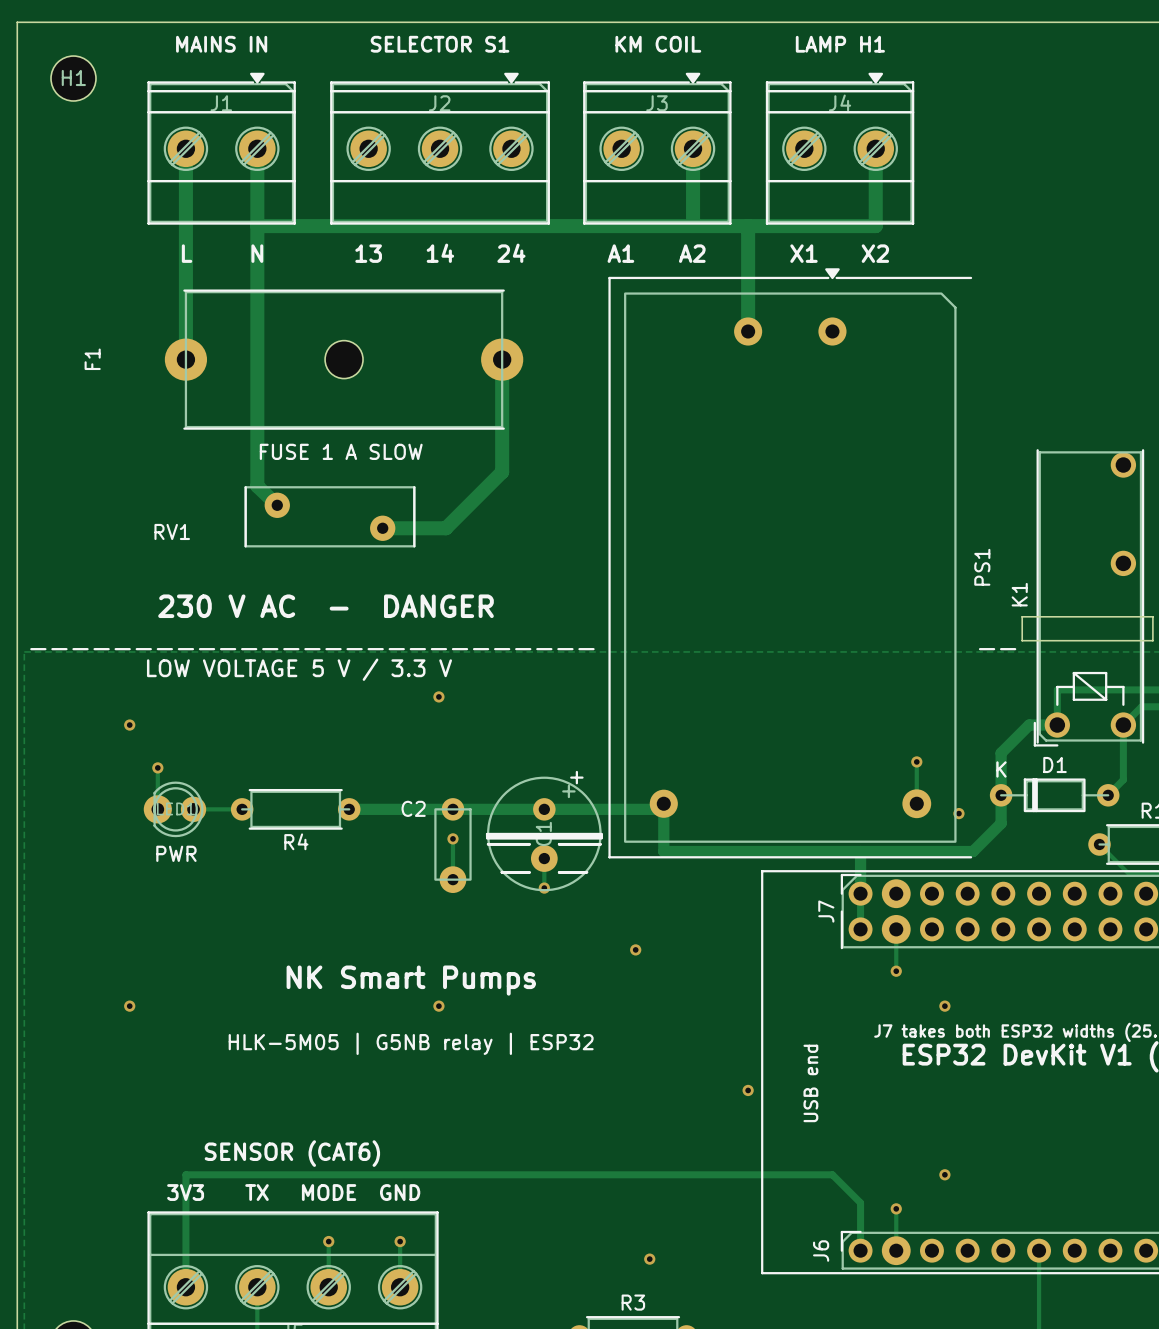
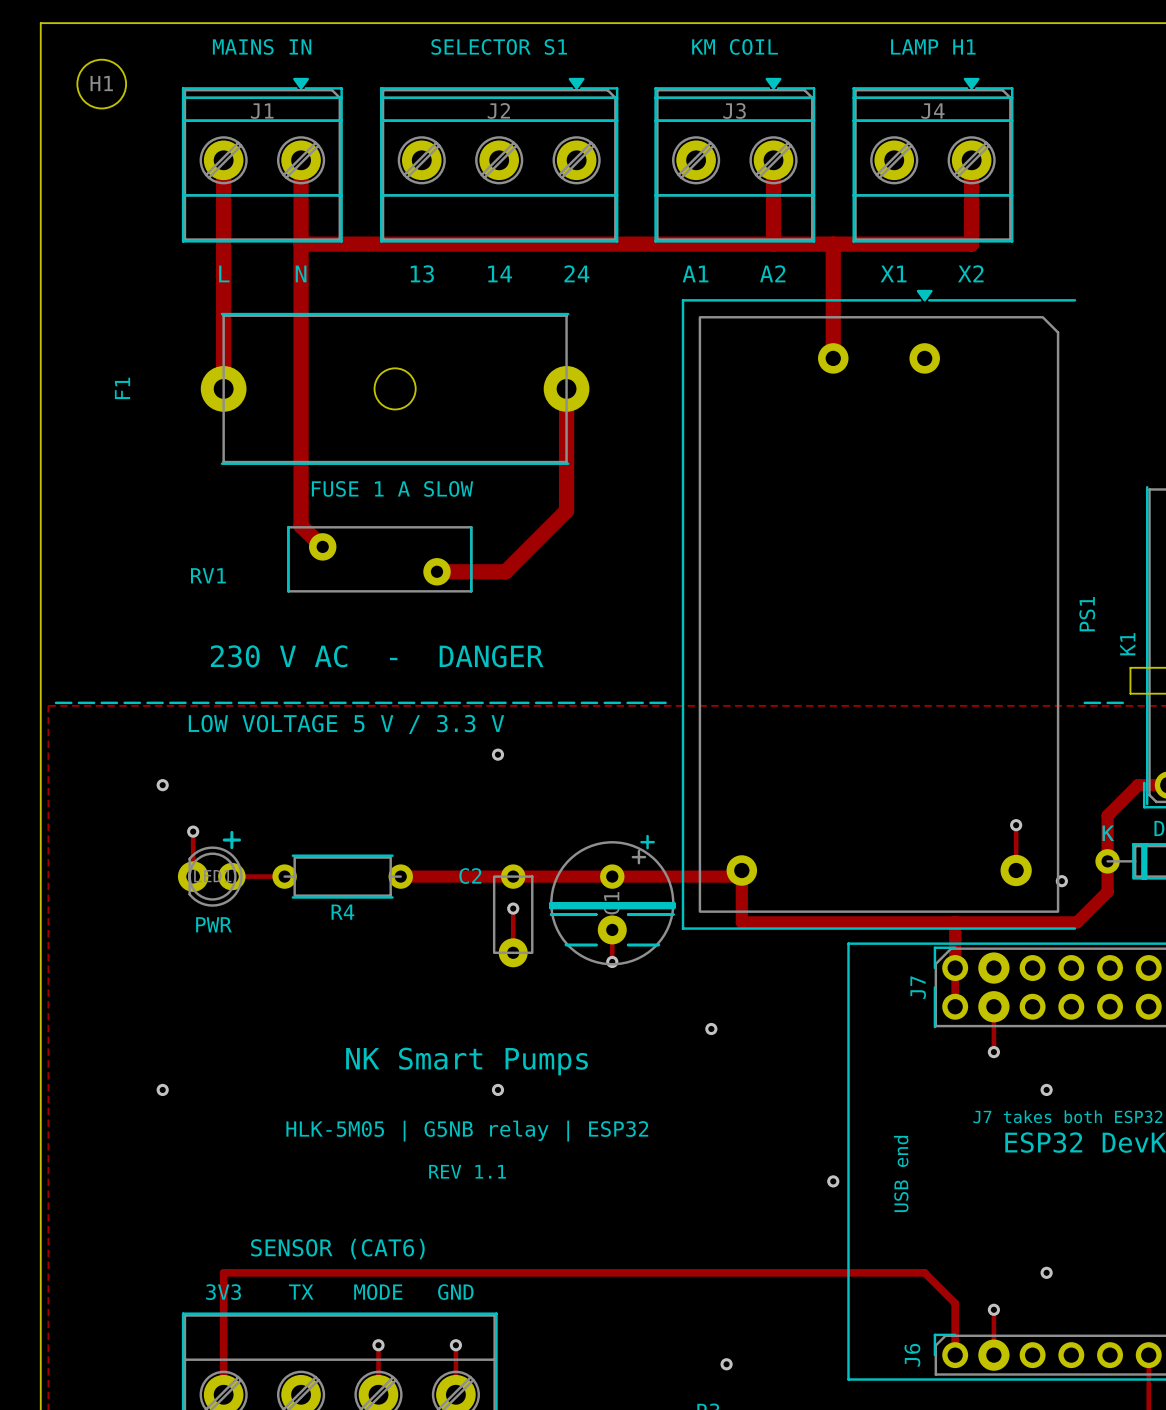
line: none -> (231, 832) (231, 847)
line: none -> (224, 840) (239, 840)
text: none -> REV 1.1 (467, 1171)

